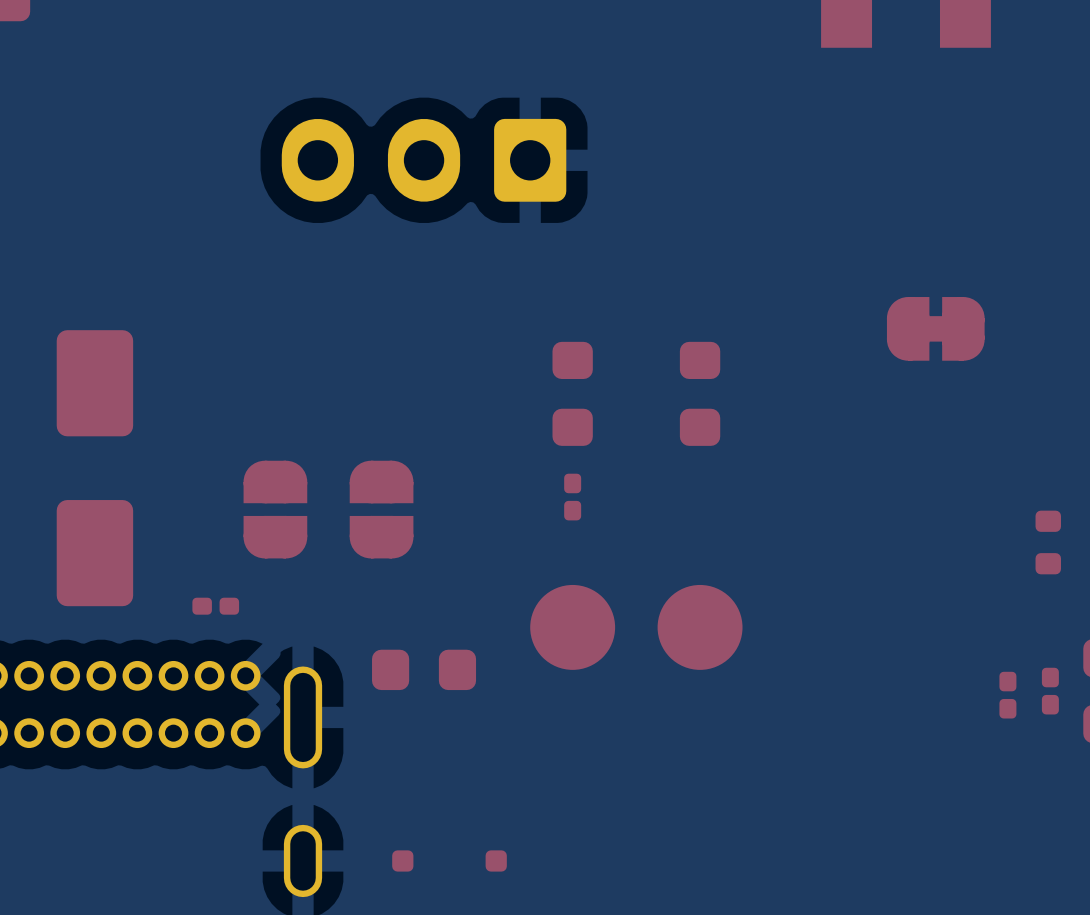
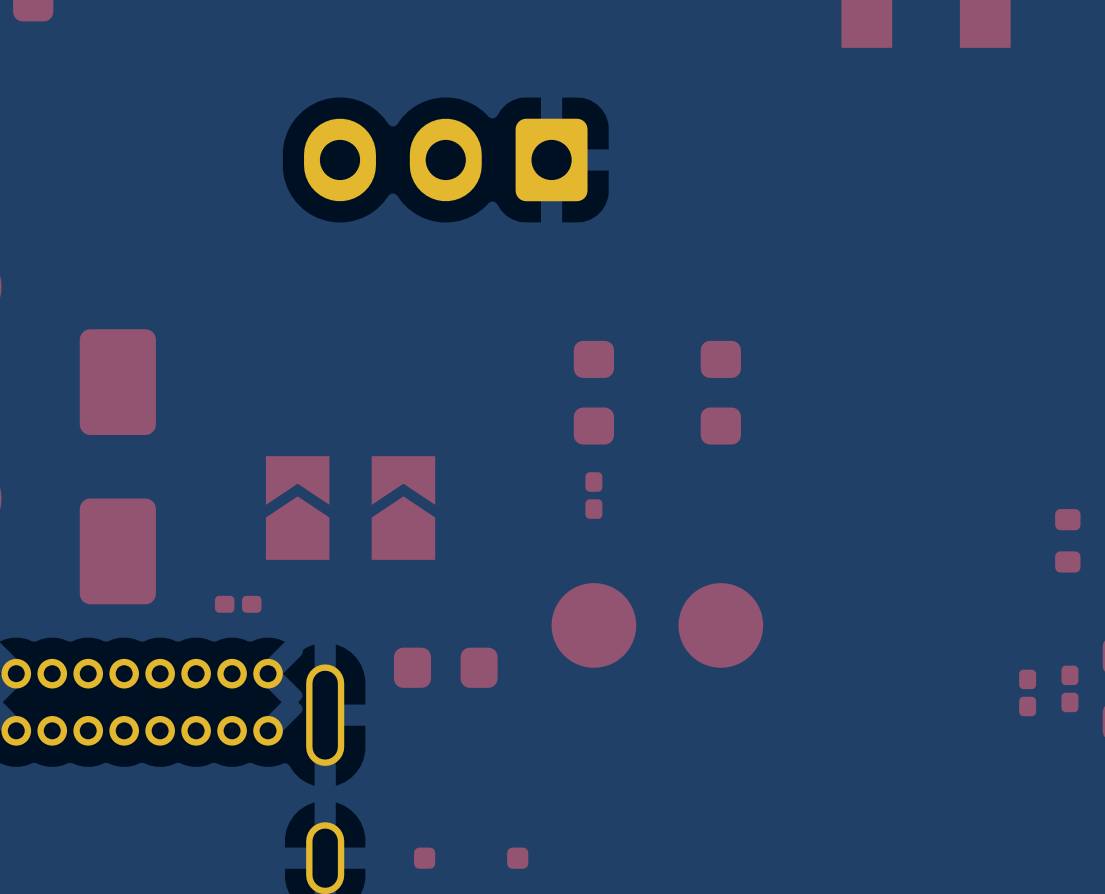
part: (935, 328) -> none
part footprint: [243, 460, 308, 559] -> [265, 456, 330, 560]
part footprint: [349, 460, 414, 559] -> [371, 456, 436, 560]

